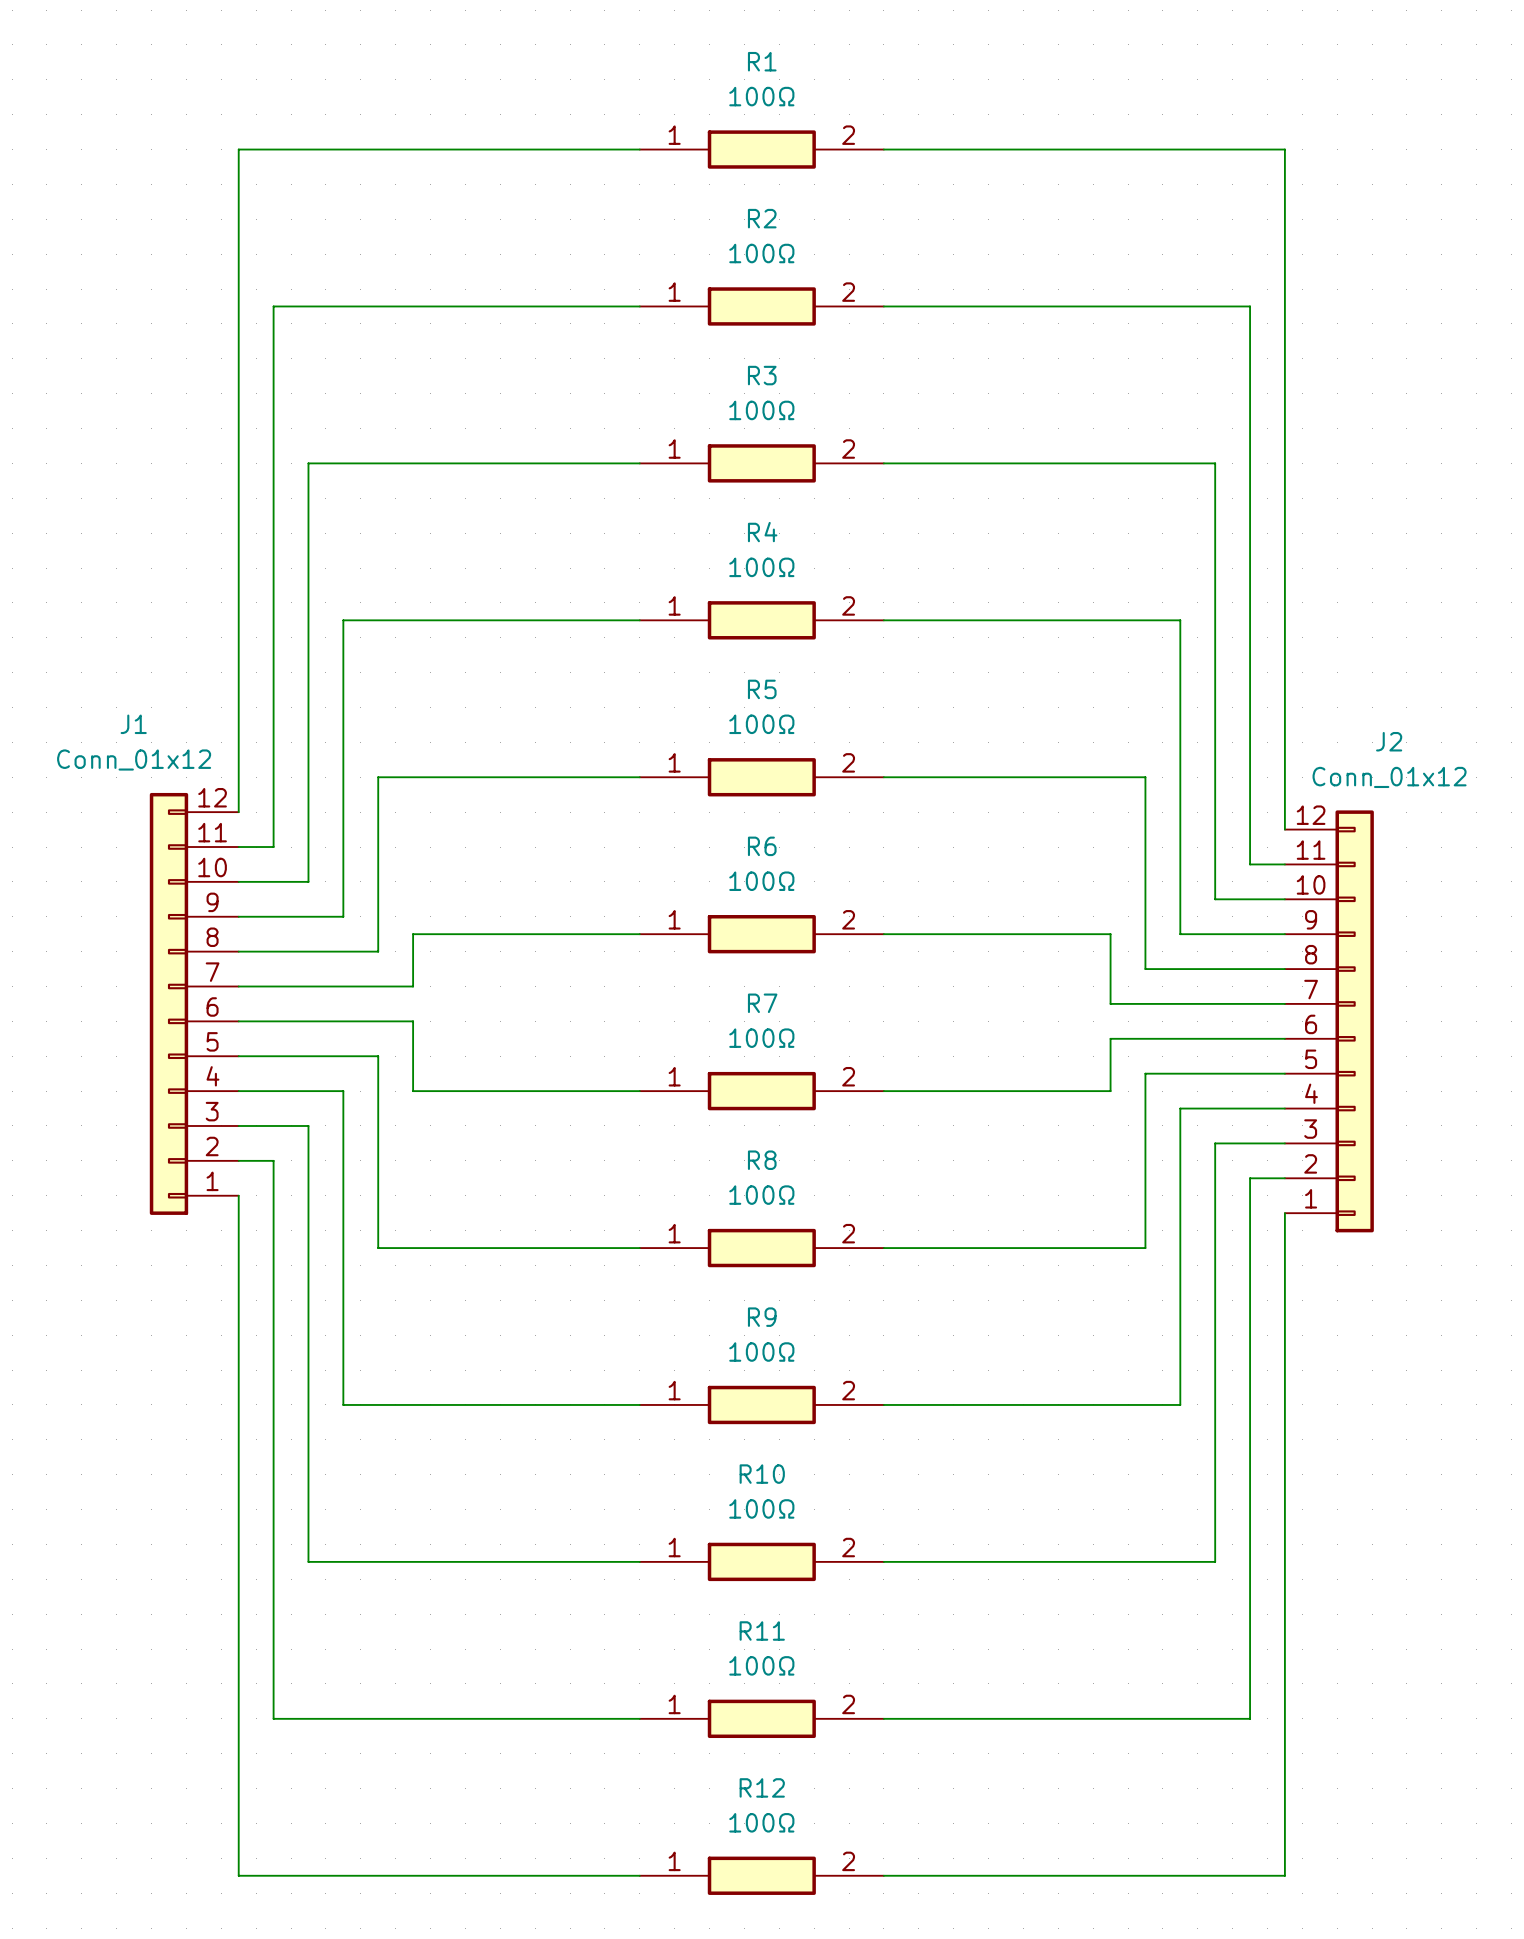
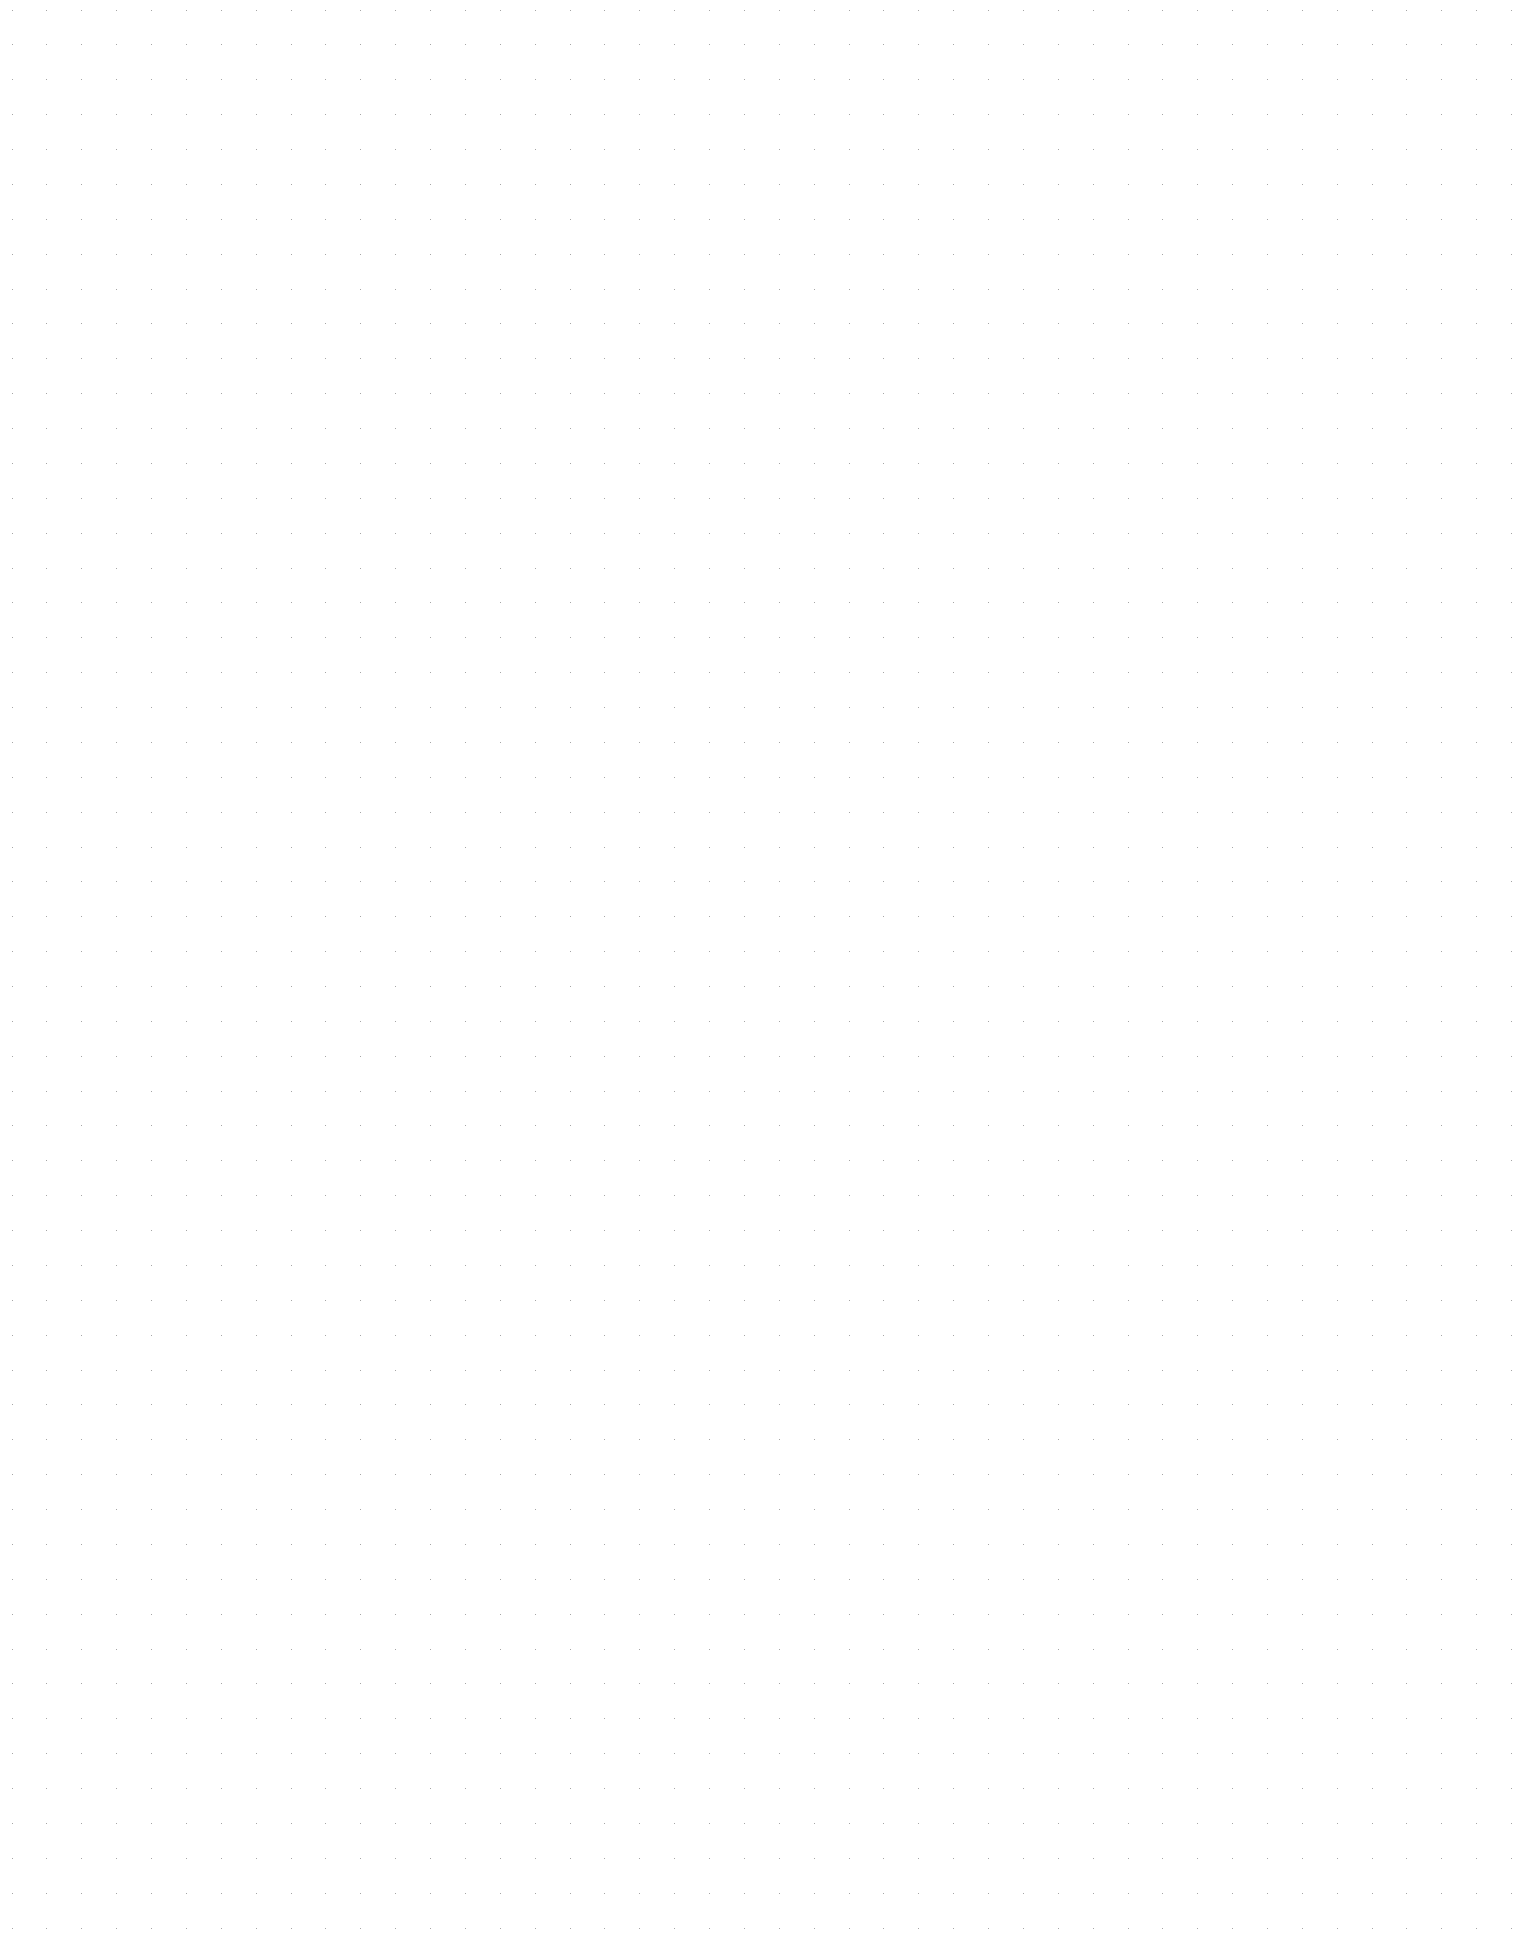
wire: (639, 149) (238, 149) (238, 812) -> none
R1: 100Ω (761, 149) -> none
wire: (883, 149) (1284, 149) (1284, 829) -> none
wire: (639, 306) (273, 306) (273, 847) (238, 847) -> none
R2: 100Ω (761, 306) -> none
wire: (883, 306) (1250, 306) (1250, 864) (1284, 864) -> none
wire: (639, 463) (308, 463) (308, 881) (238, 881) -> none
R3: 100Ω (761, 463) -> none
wire: (883, 463) (1215, 463) (1215, 899) (1284, 899) -> none
wire: (639, 620) (343, 620) (343, 916) (238, 916) -> none
R4: 100Ω (761, 620) -> none
wire: (883, 620) (1180, 620) (1180, 934) (1284, 934) -> none
wire: (639, 777) (378, 777) (378, 951) (238, 951) -> none
R5: 100Ω (761, 777) -> none
wire: (883, 777) (1145, 777) (1145, 969) (1284, 969) -> none
wire: (639, 934) (413, 934) (413, 986) (238, 986) -> none
R6: 100Ω (761, 934) -> none
wire: (883, 934) (1110, 934) (1110, 1003) (1284, 1003) -> none
J1: Conn_01x12 (194, 1003) -> none
wire: (238, 1021) (413, 1021) (413, 1091) (639, 1091) -> none
J2: Conn_01x12 (1329, 1021) -> none
wire: (1284, 1038) (1110, 1038) (1110, 1091) (883, 1091) -> none
wire: (238, 1056) (378, 1056) (378, 1248) (639, 1248) -> none
wire: (1284, 1073) (1145, 1073) (1145, 1248) (883, 1248) -> none
wire: (238, 1091) (343, 1091) (343, 1404) (639, 1404) -> none
R7: 100Ω (761, 1091) -> none
wire: (1284, 1108) (1180, 1108) (1180, 1404) (883, 1404) -> none
wire: (238, 1125) (308, 1125) (308, 1561) (639, 1561) -> none
wire: (1284, 1143) (1215, 1143) (1215, 1561) (883, 1561) -> none
wire: (238, 1160) (273, 1160) (273, 1718) (639, 1718) -> none
wire: (1284, 1178) (1250, 1178) (1250, 1718) (883, 1718) -> none
wire: (238, 1195) (238, 1875) (639, 1875) -> none
wire: (1284, 1213) (1284, 1875) (883, 1875) -> none
R8: 100Ω (761, 1248) -> none
R9: 100Ω (761, 1404) -> none
R10: 100Ω (761, 1561) -> none
R11: 100Ω (761, 1718) -> none
R12: 100Ω (761, 1875) -> none

